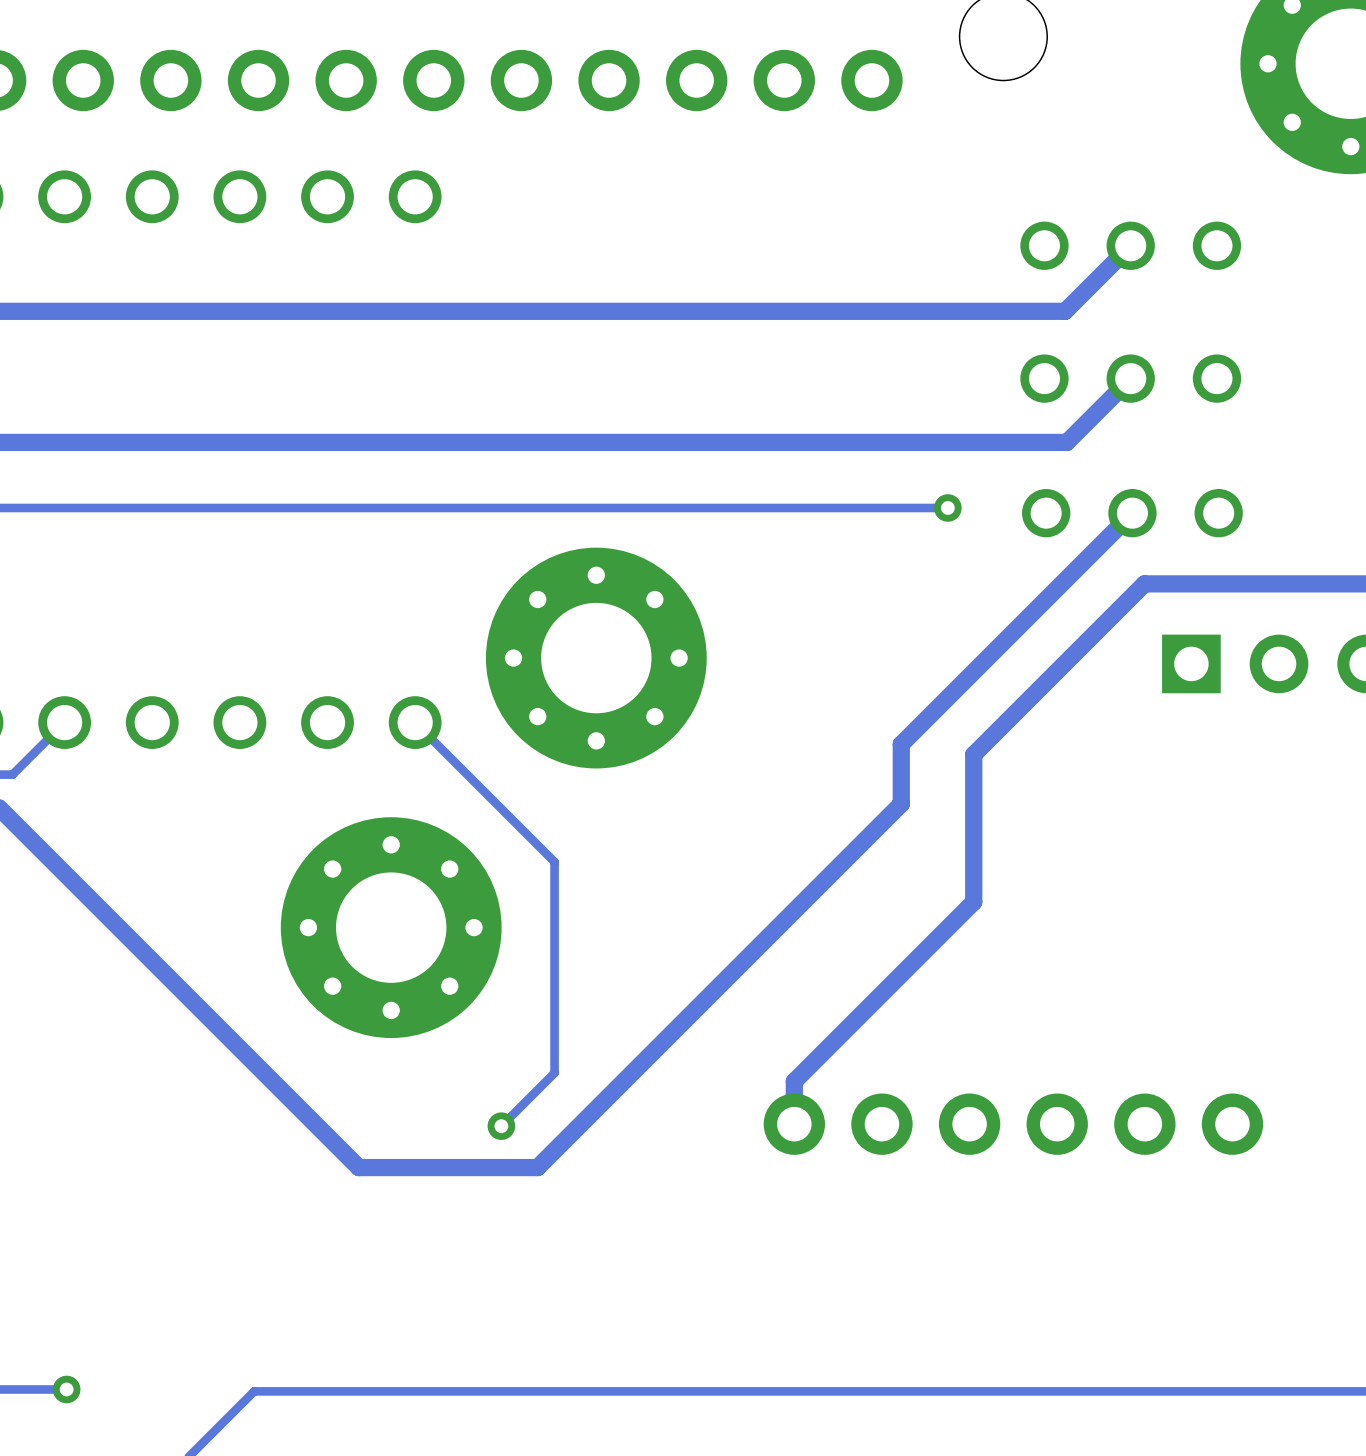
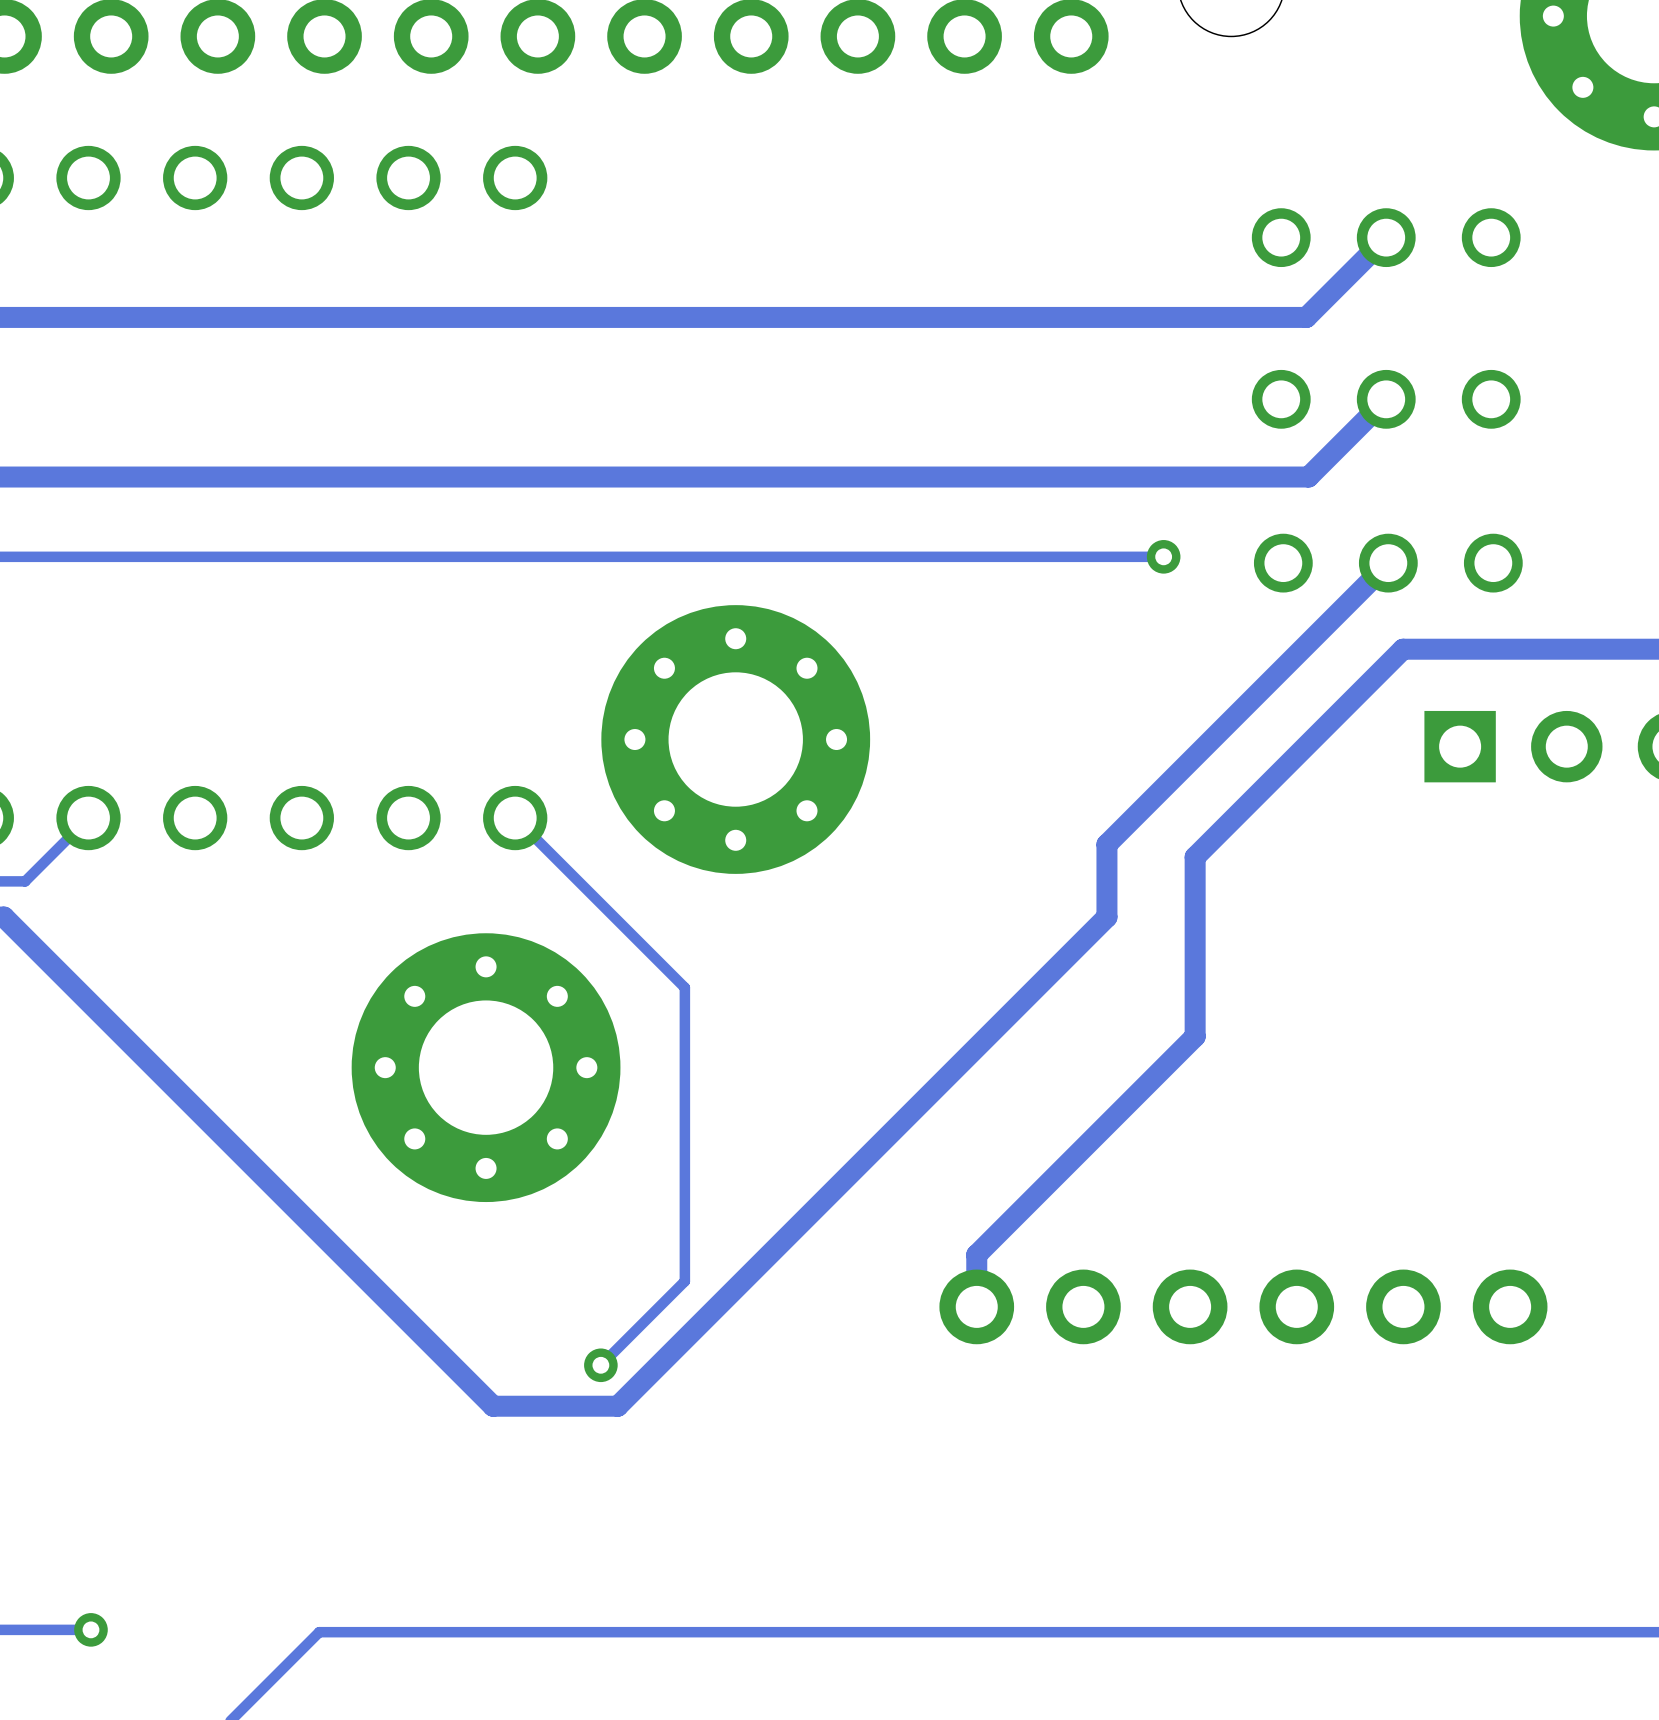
track: (554, 1073) (501, 1126) -> (684, 1244) (684, 1281) (600, 1365)
via position: (501, 1126) -> (600, 1365)
track: (537, 1167) (358, 1167) -> (664, 1359) (617, 1406) (493, 1406) (446, 1359)

